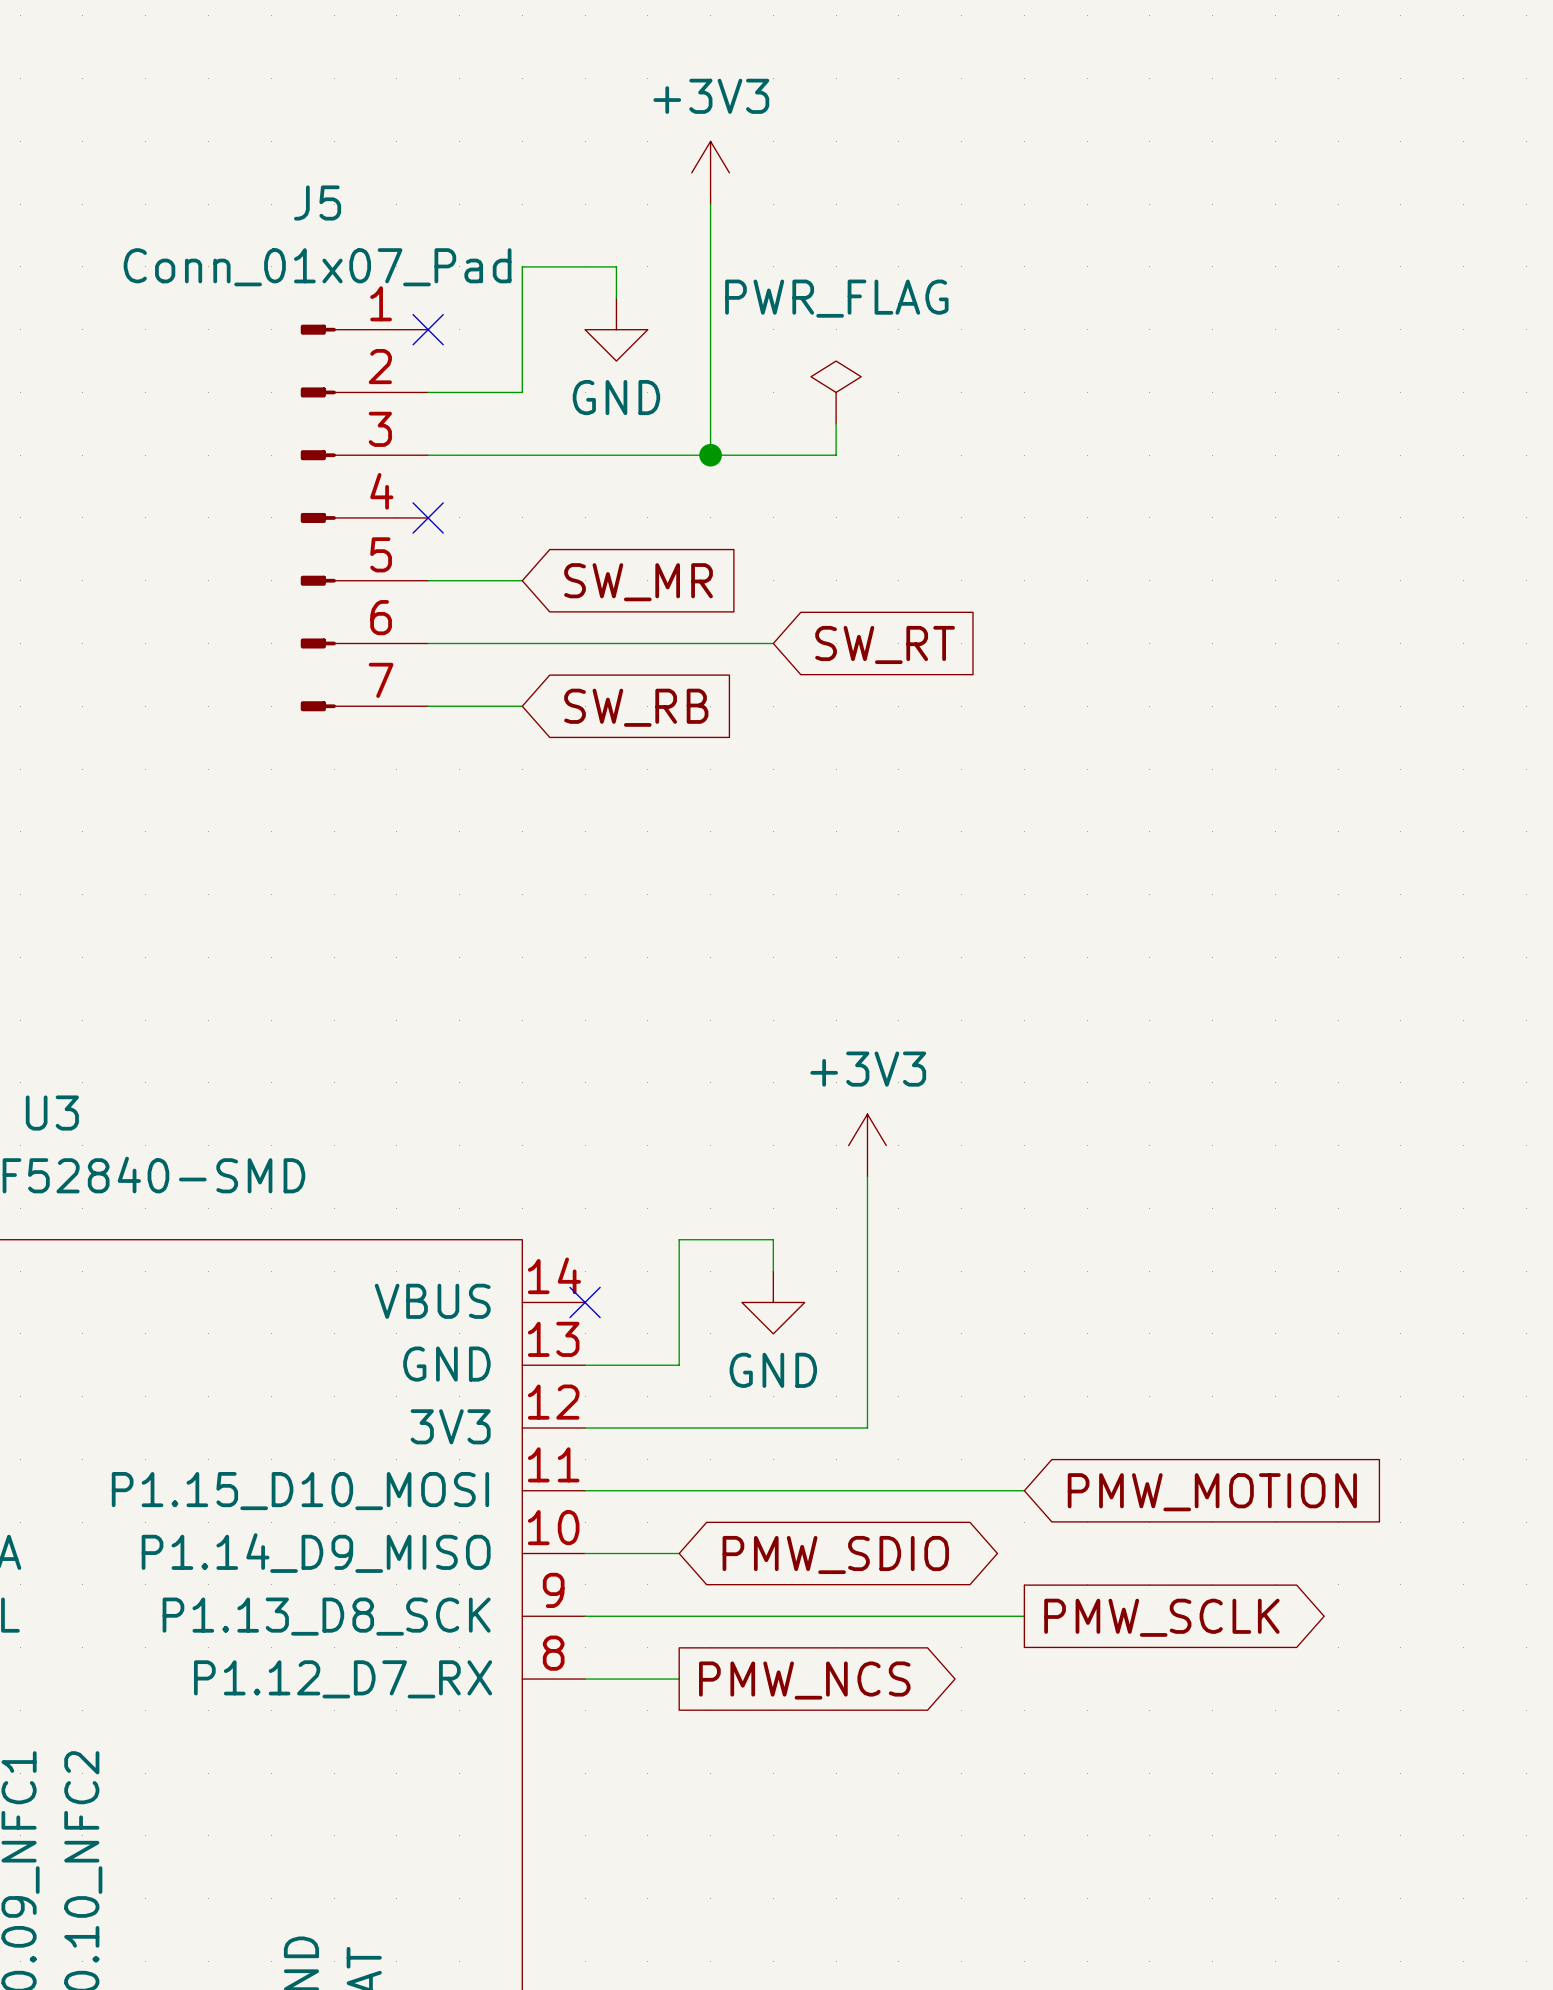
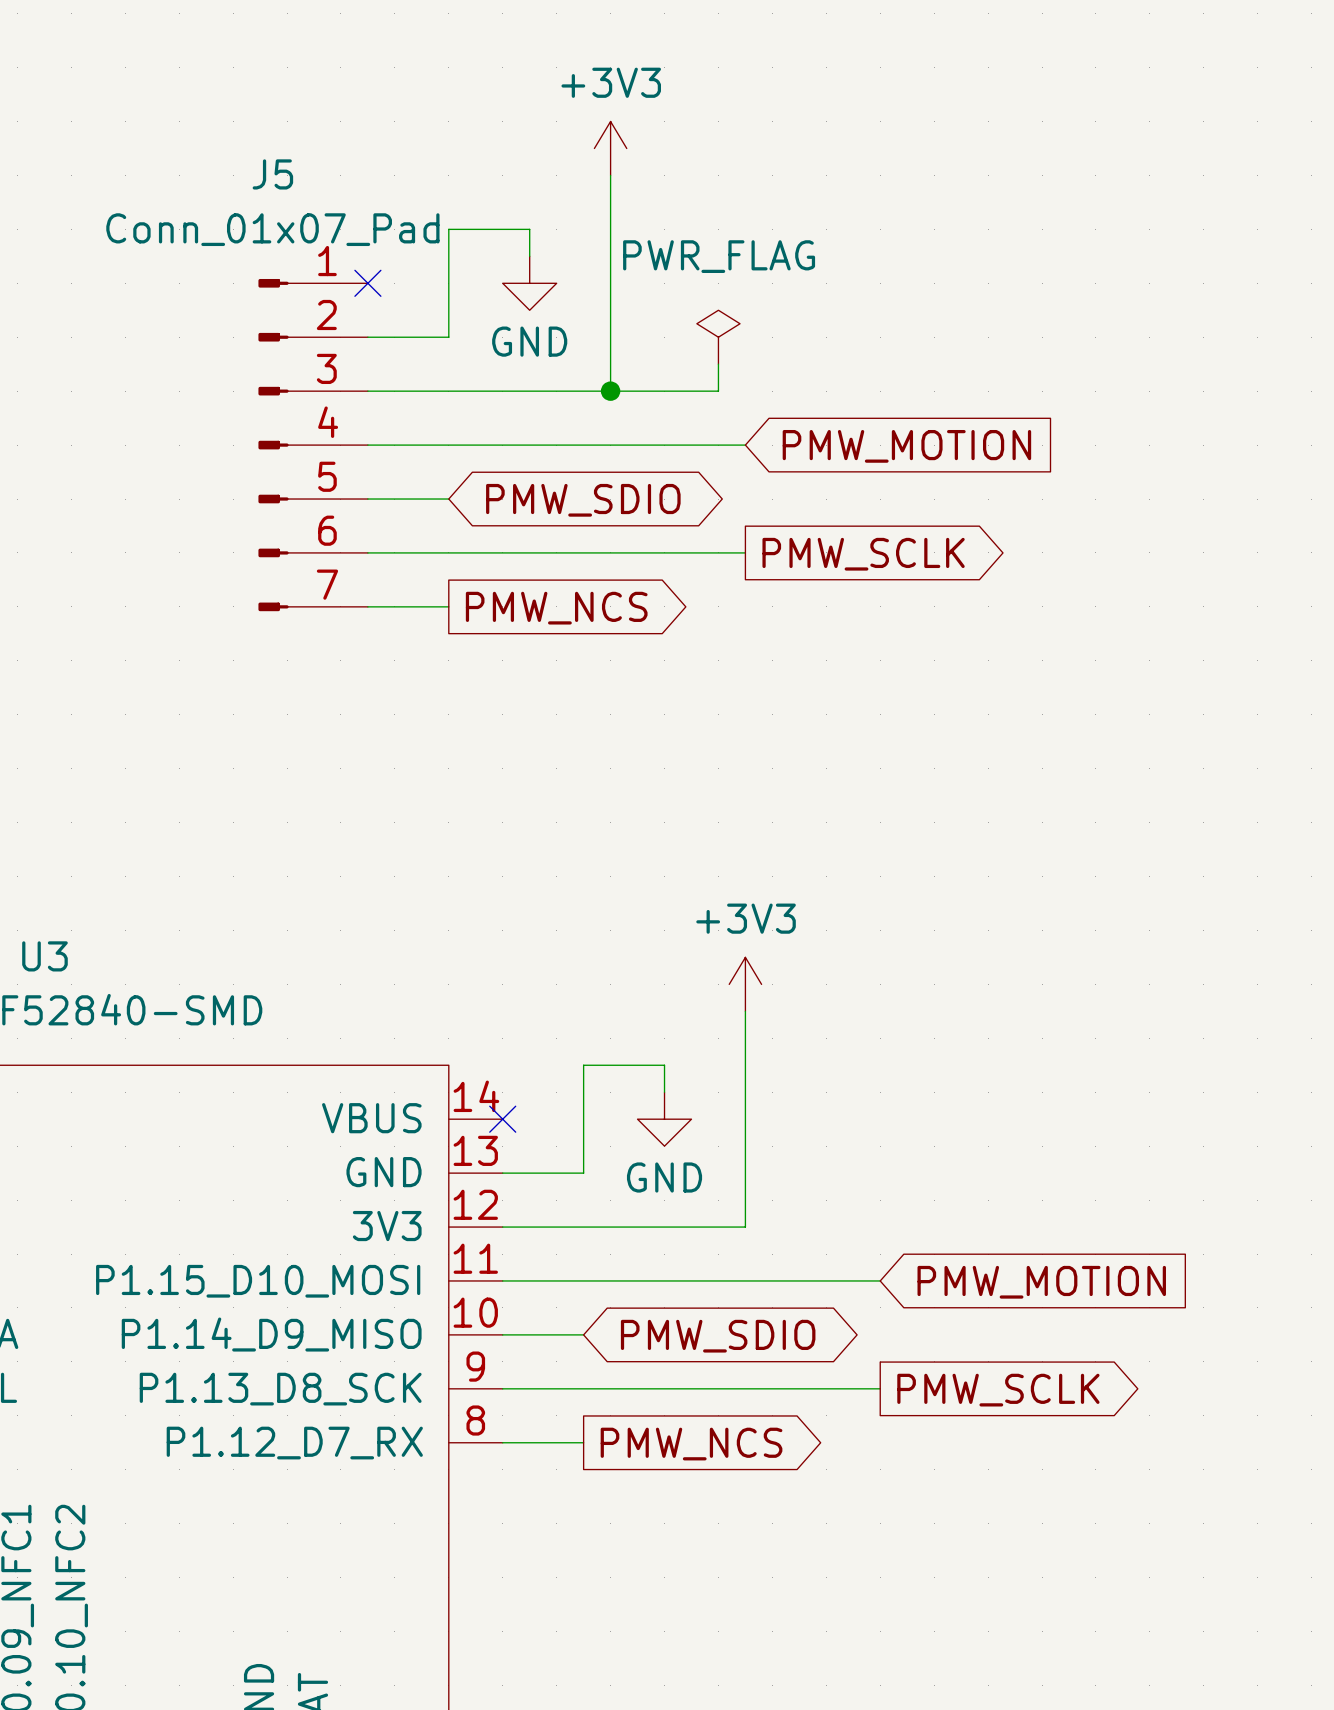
wire: none -> (367, 445) (745, 445)
no-connect mark: (428, 517) -> none
global label: none -> PMW_MOTION (906, 446)
global label shape: input (638, 582) -> bidirectional (583, 500)
global label: SW_MR (638, 582) -> PMW_SDIO (583, 500)
wire: none -> (664, 552) (745, 552)
global label: SW_RT (885, 644) -> none
global label: none -> PMW_SCLK (863, 554)
global label shape: input (636, 707) -> output (556, 608)
global label: SW_RB (636, 707) -> PMW_NCS (556, 608)

